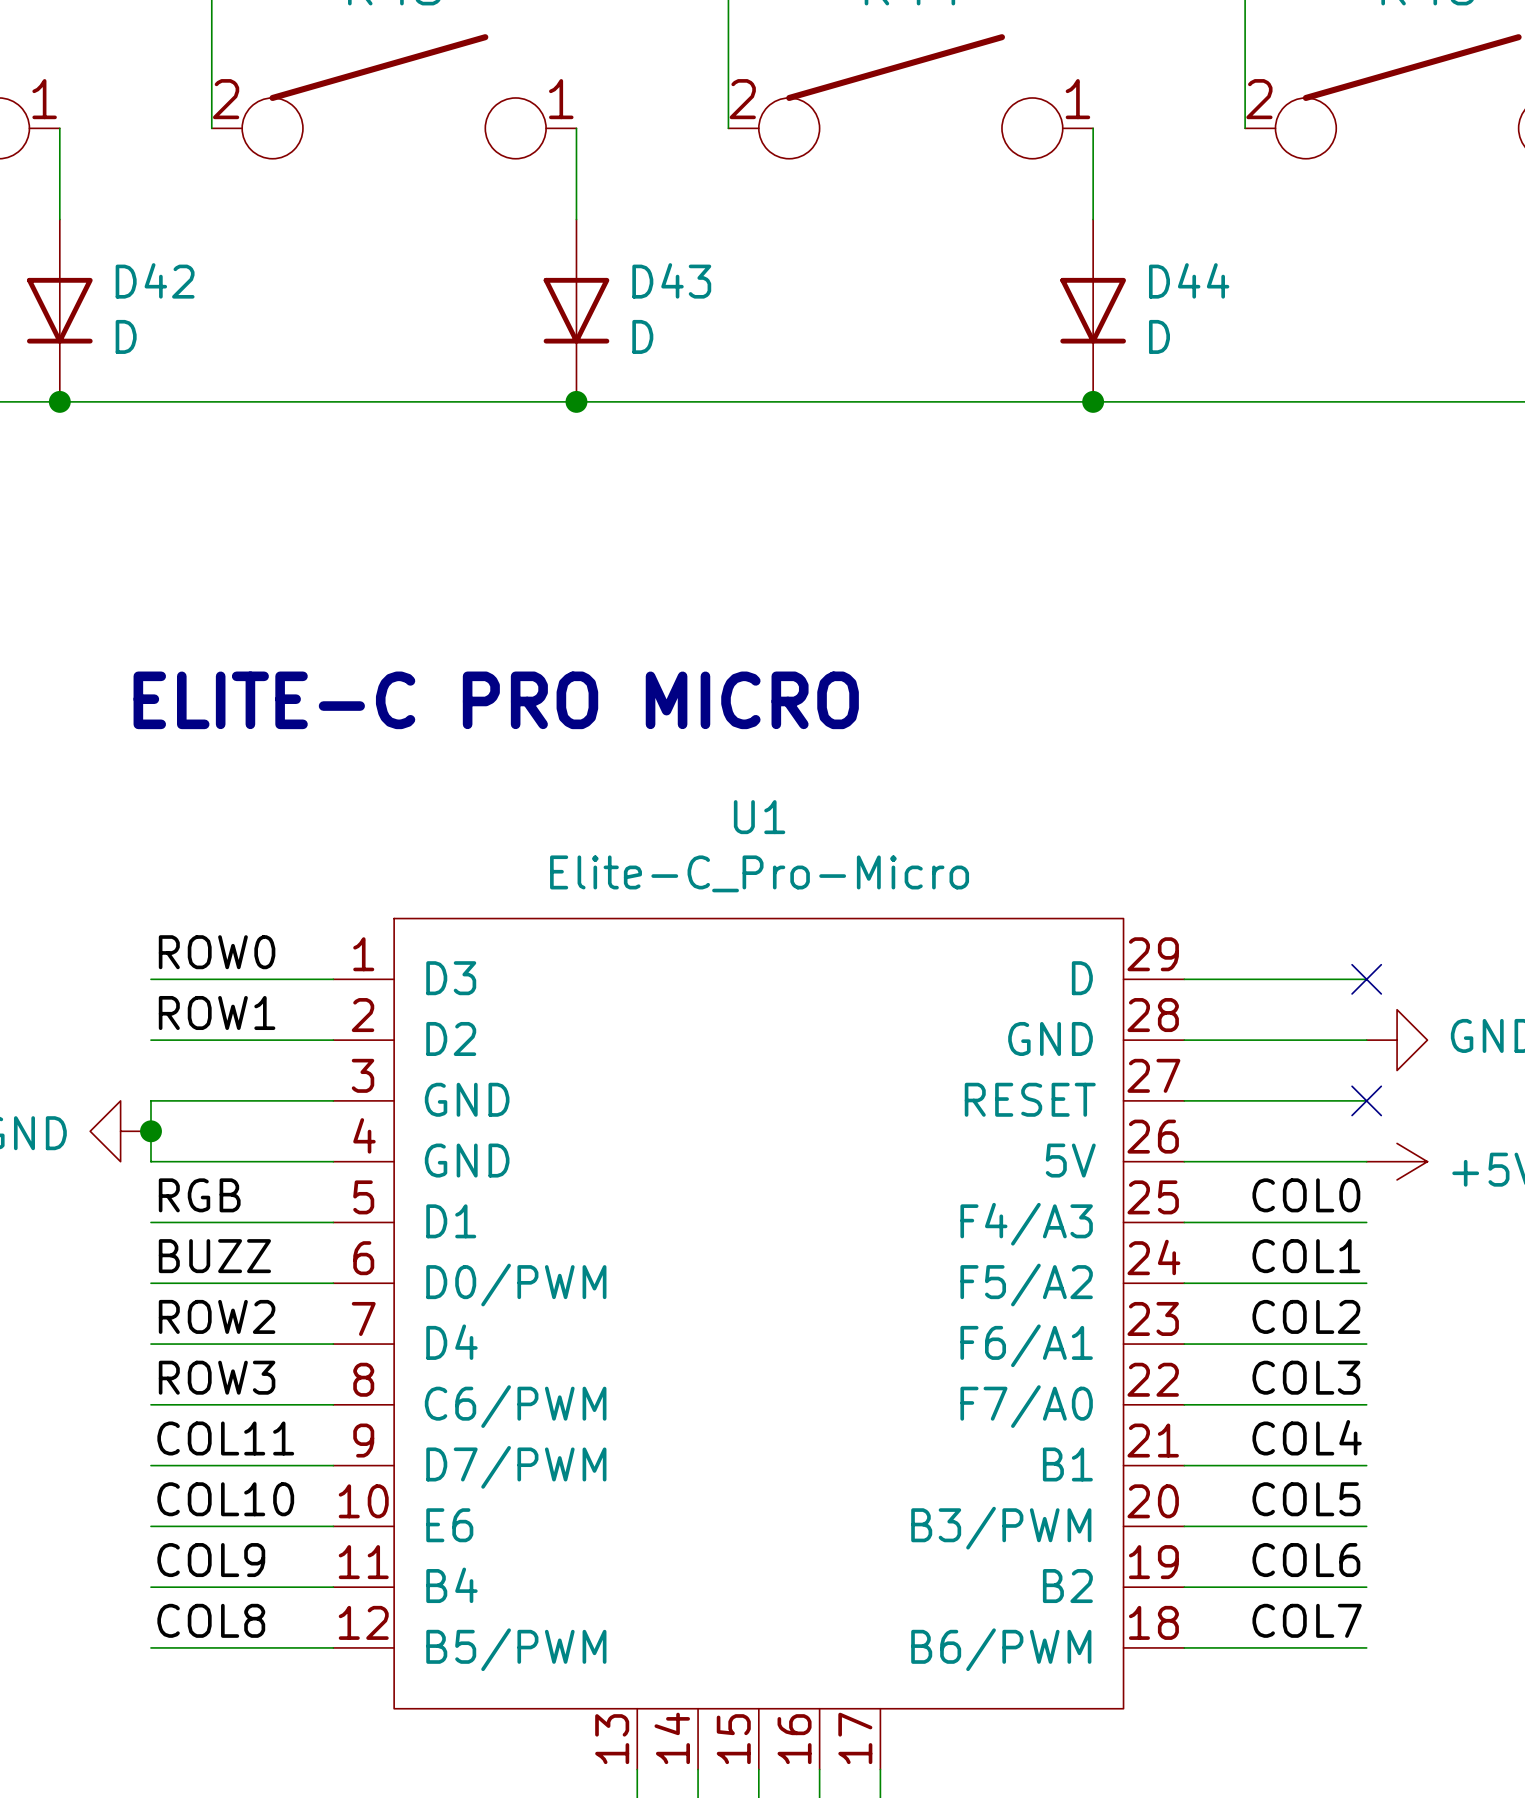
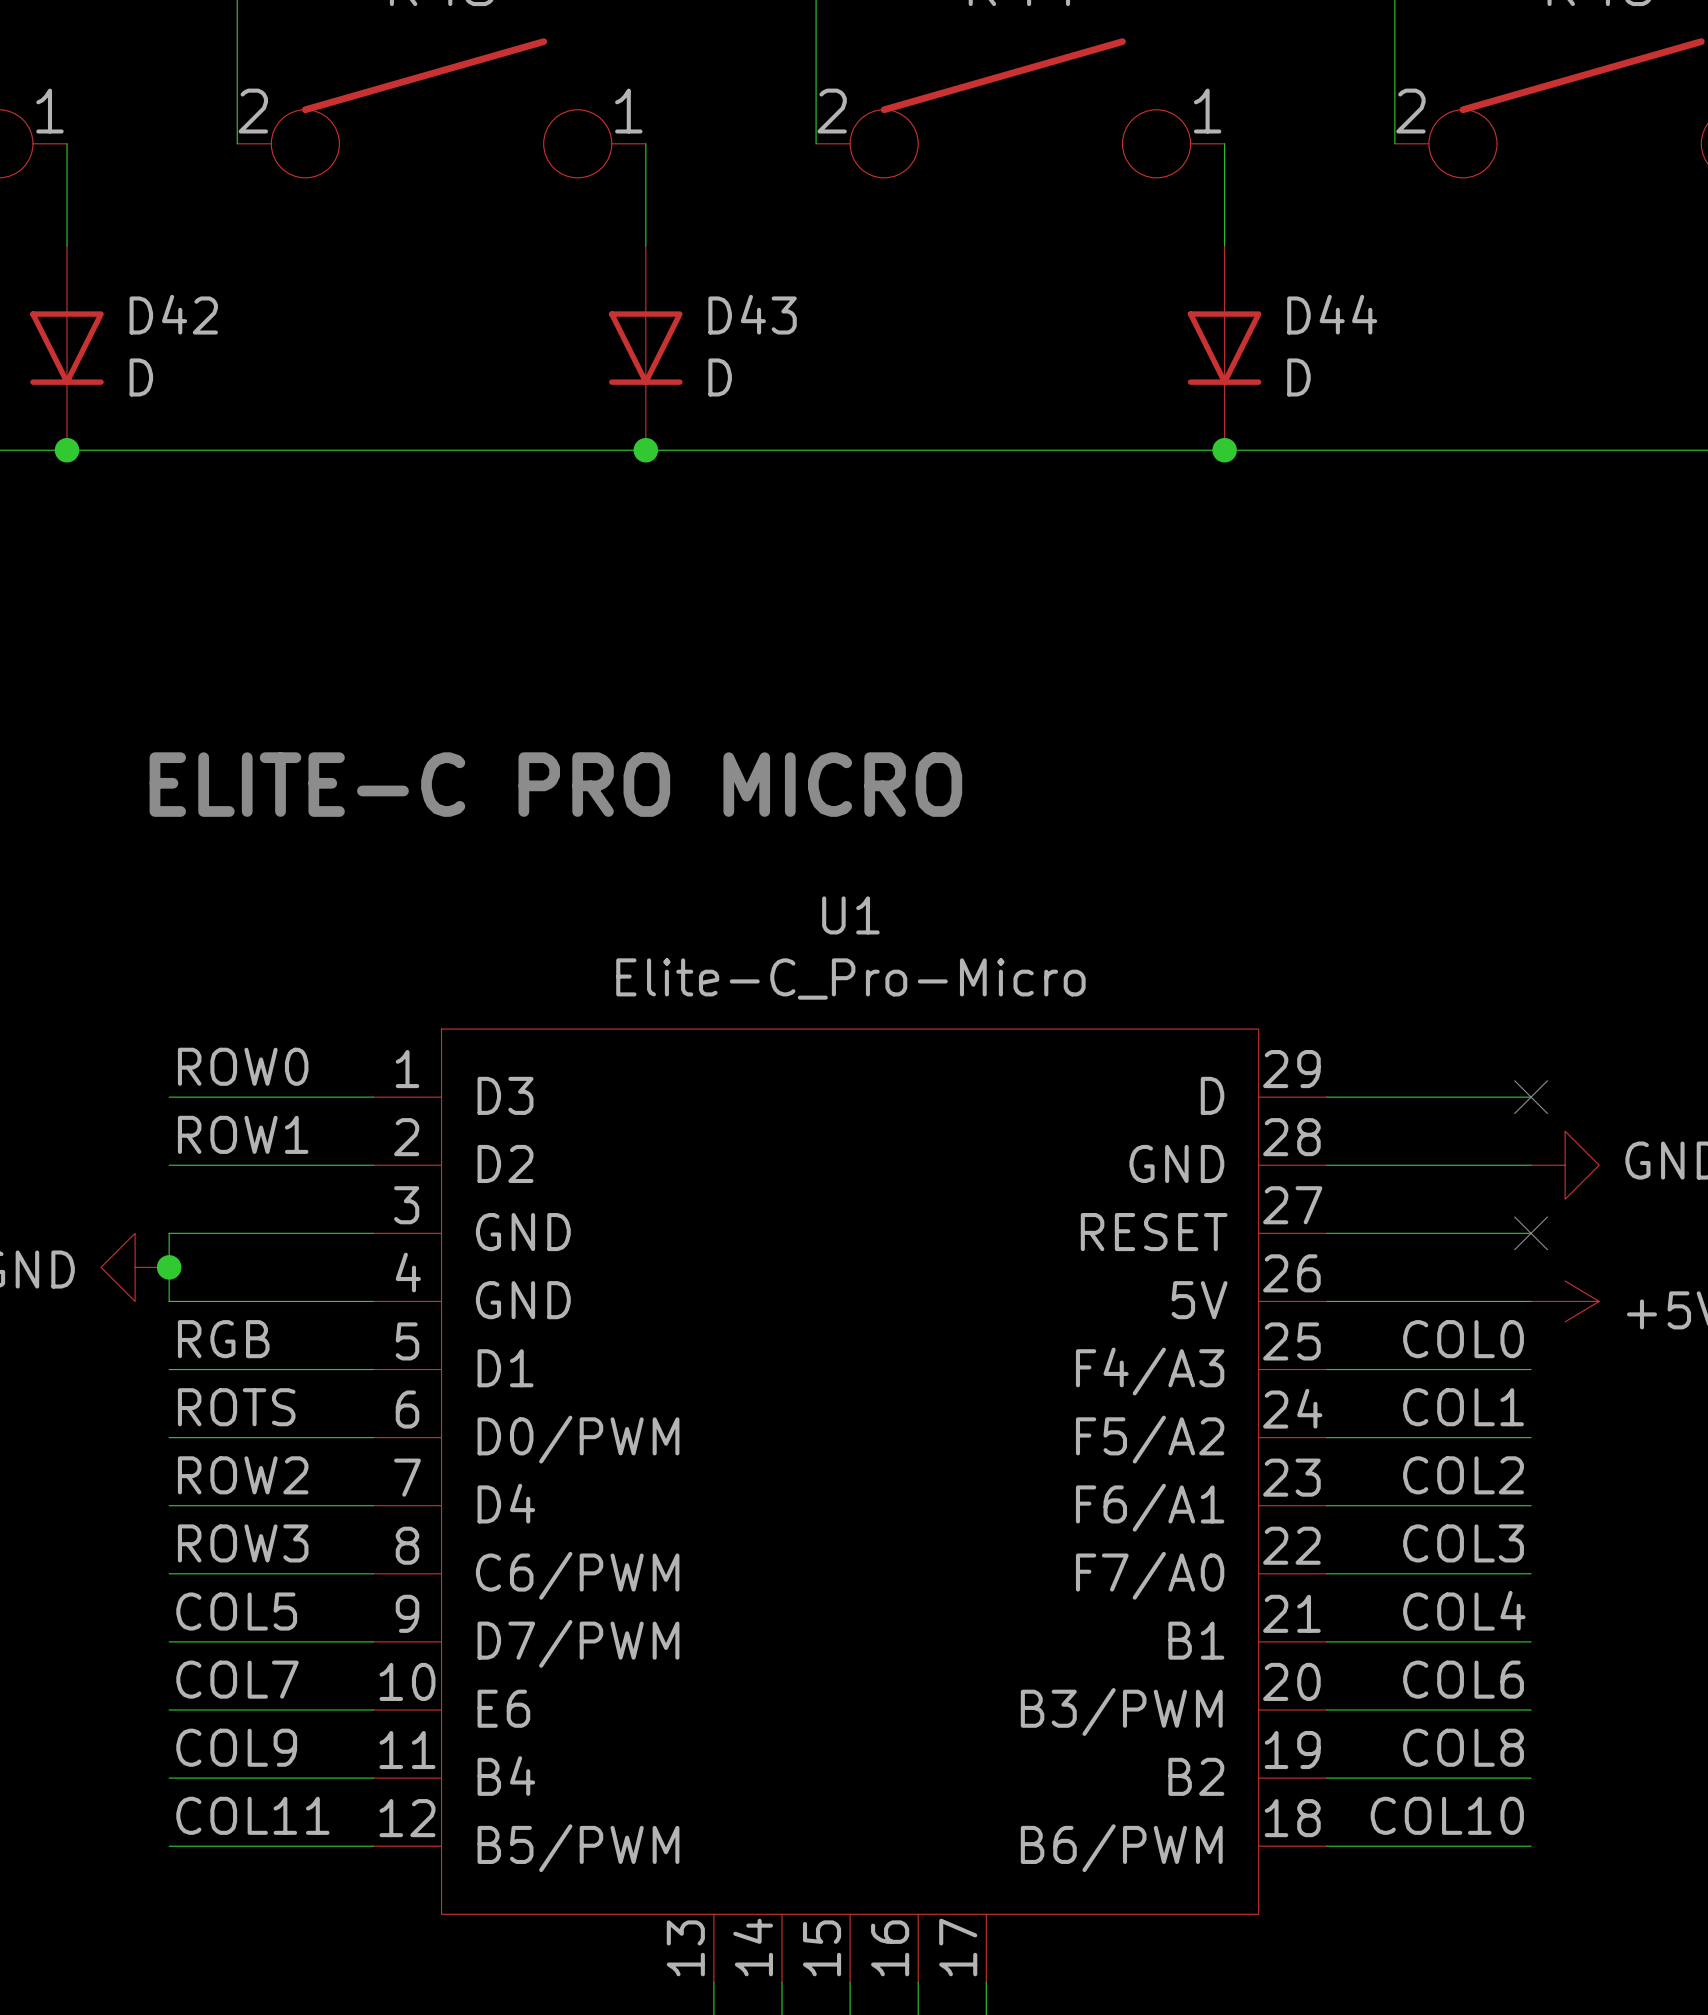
label: BUZZ (214, 1256) -> ROTS (236, 1407)
label: COL11 (225, 1438) -> COL5 (236, 1611)
label: COL10 (225, 1499) -> COL7 (237, 1679)
label: COL5 (1306, 1499) -> COL6 (1463, 1679)
label: COL6 (1306, 1560) -> COL8 (1463, 1747)
label: COL8 (211, 1620) -> COL11 (252, 1815)
label: COL7 (1307, 1620) -> COL10 (1447, 1815)

